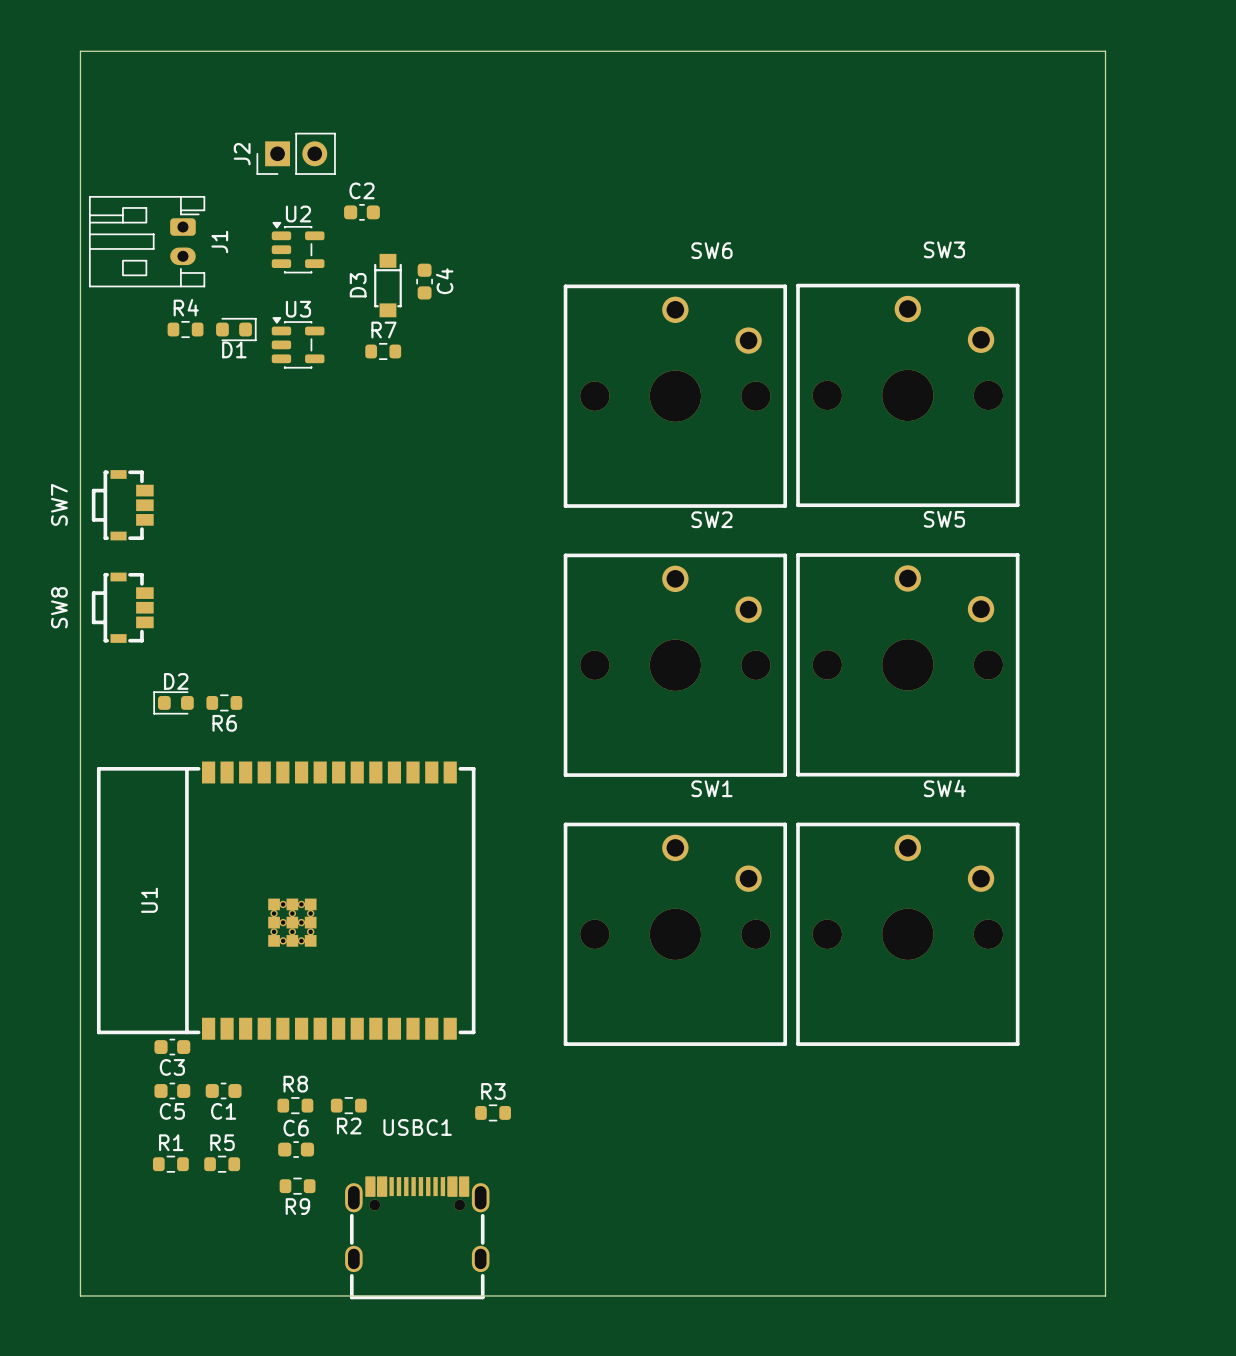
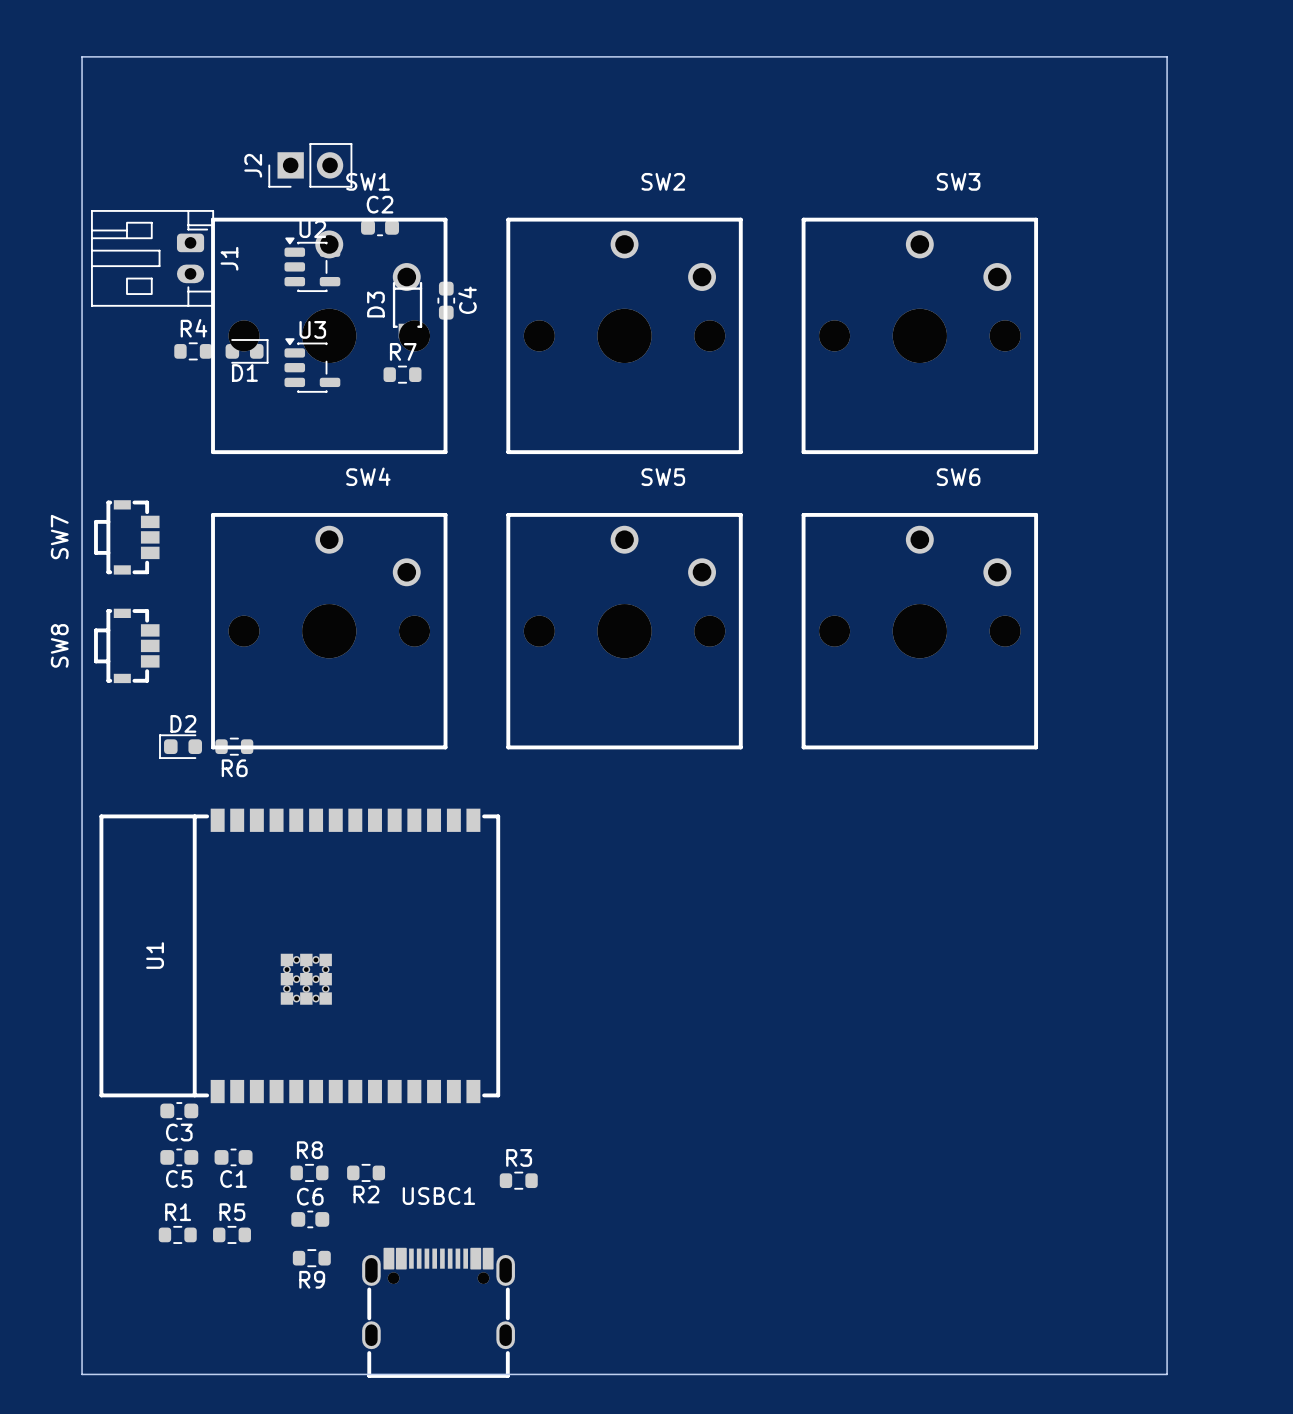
SW3 position: (907, 395) -> (919, 335)
SW6 position: (675, 396) -> (919, 631)
SW5 position: (907, 664) -> (624, 631)
SW2 position: (675, 665) -> (624, 335)
SW1 position: (675, 934) -> (329, 335)
SW4 position: (907, 934) -> (329, 631)

